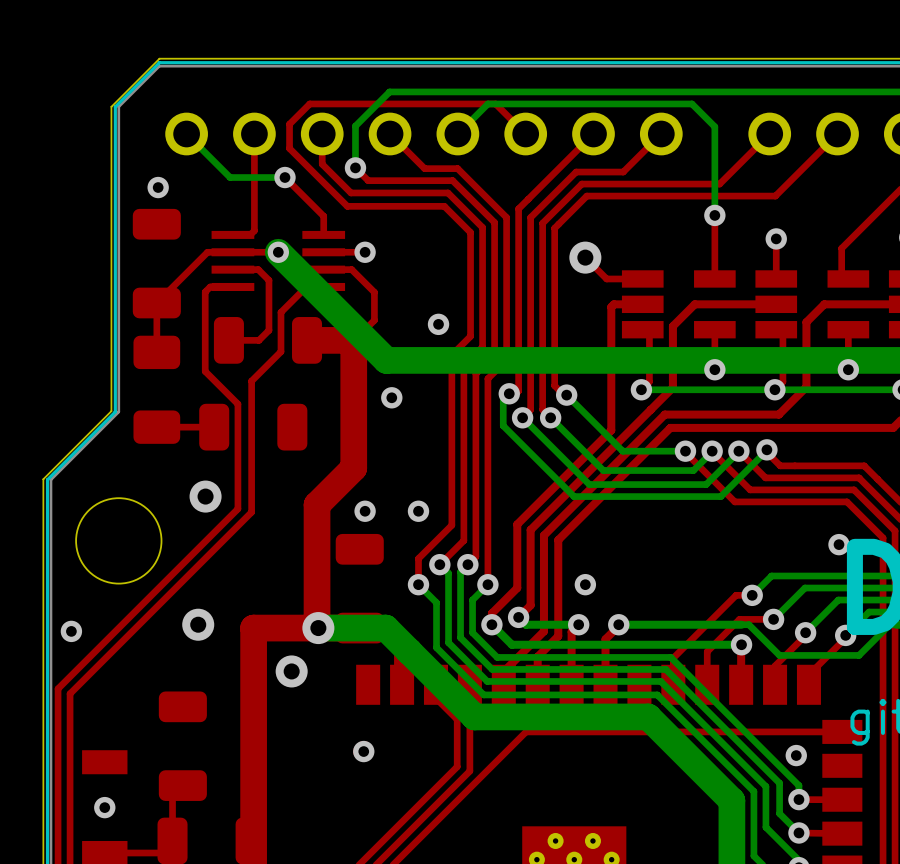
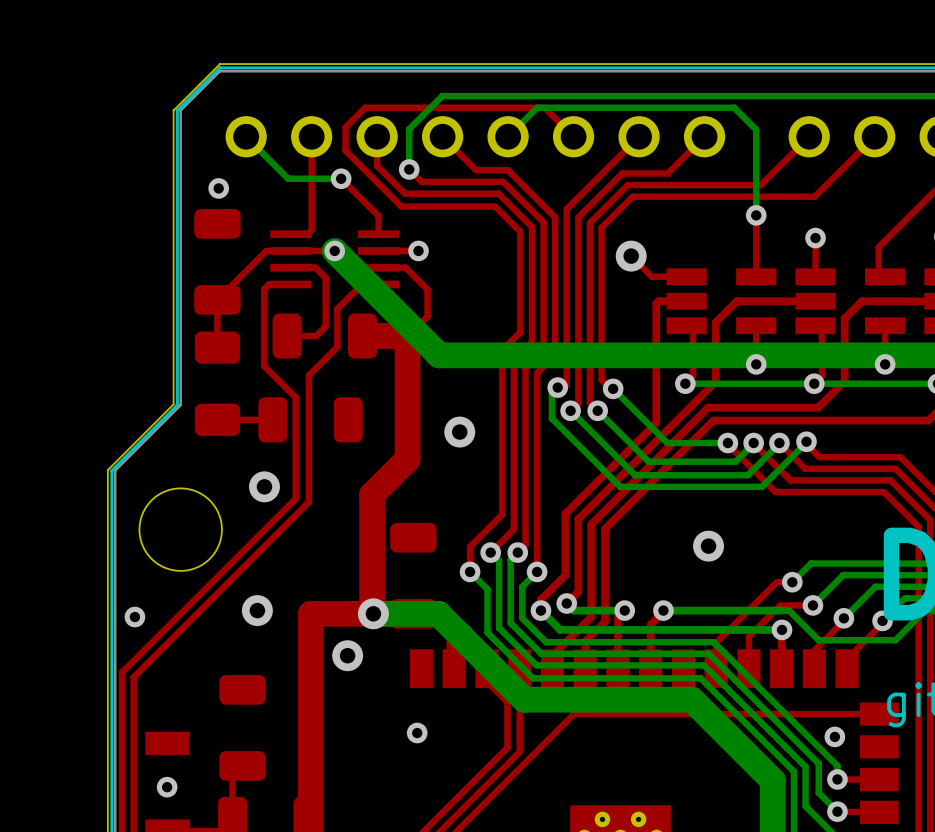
via: (438, 324) -> none
via: (391, 397) -> none
via: none -> (459, 432)
via: (365, 511) -> none
via: (418, 511) -> none
via: (839, 544) -> none
via: none -> (708, 546)
via: (585, 584) -> none

